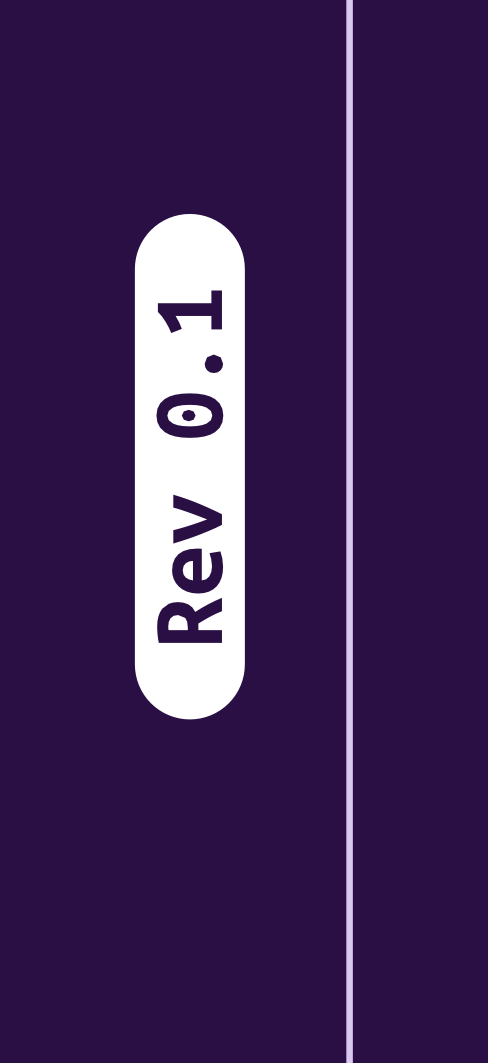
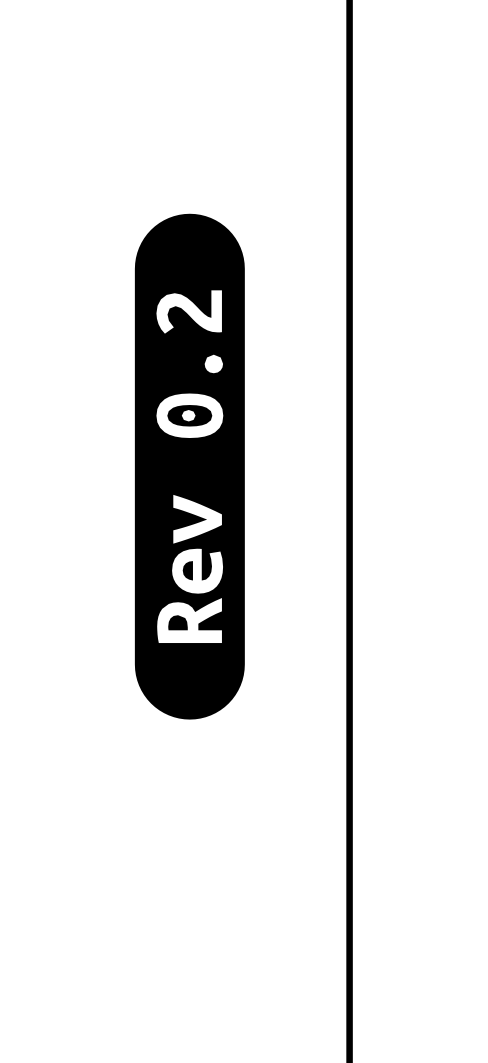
drawing shape: [134, 213, 245, 720] -> [134, 213, 245, 720]

